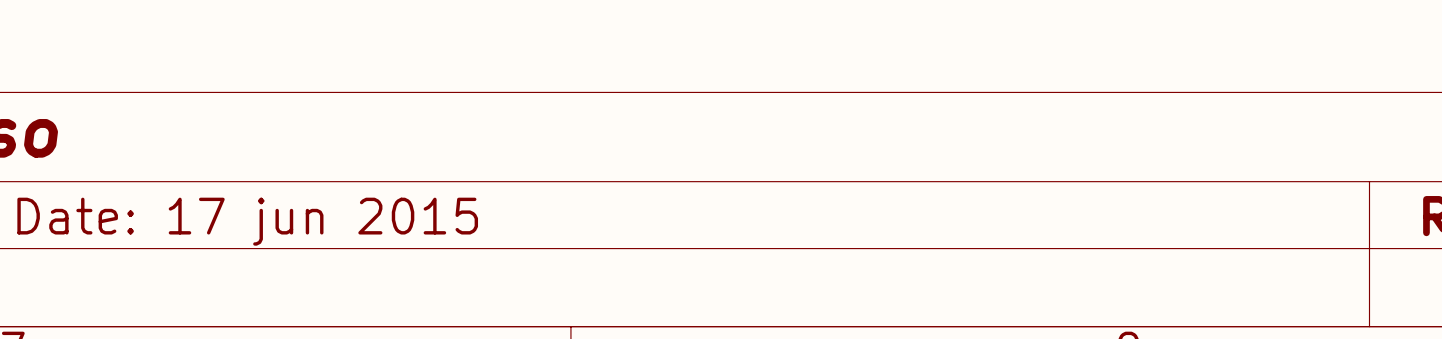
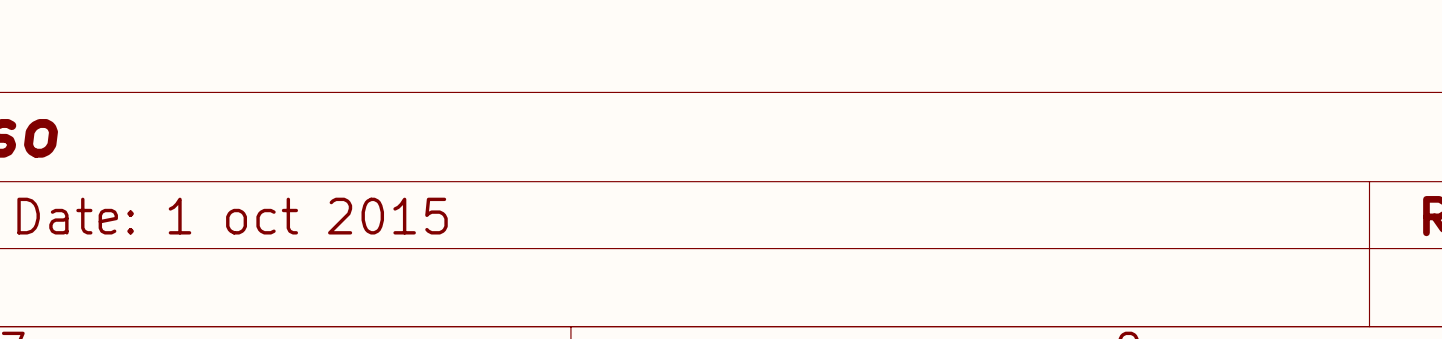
title block: Date: 17 jun 2015 (247, 221) -> Date: 1 oct 2015 (232, 216)

